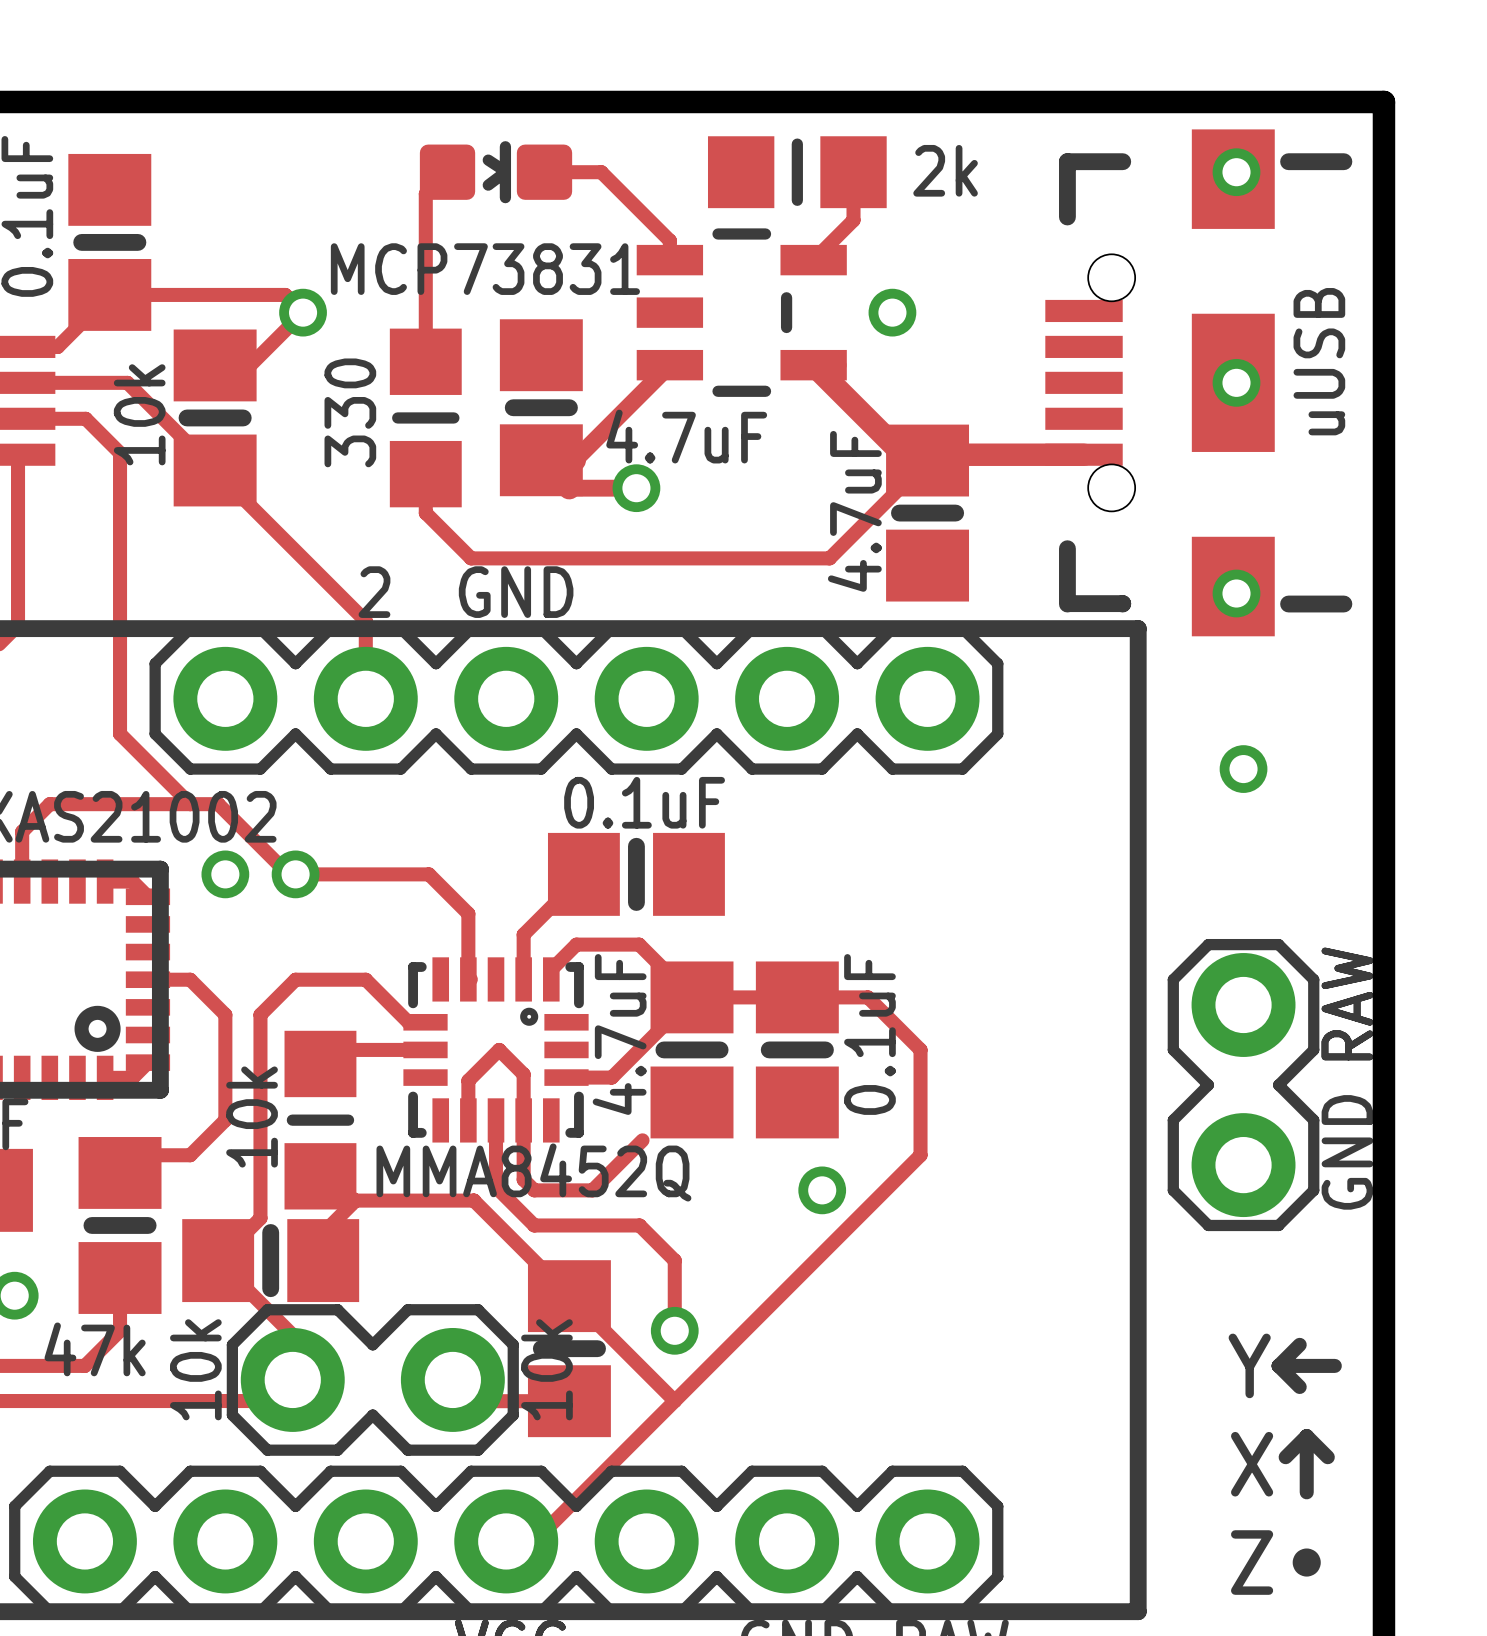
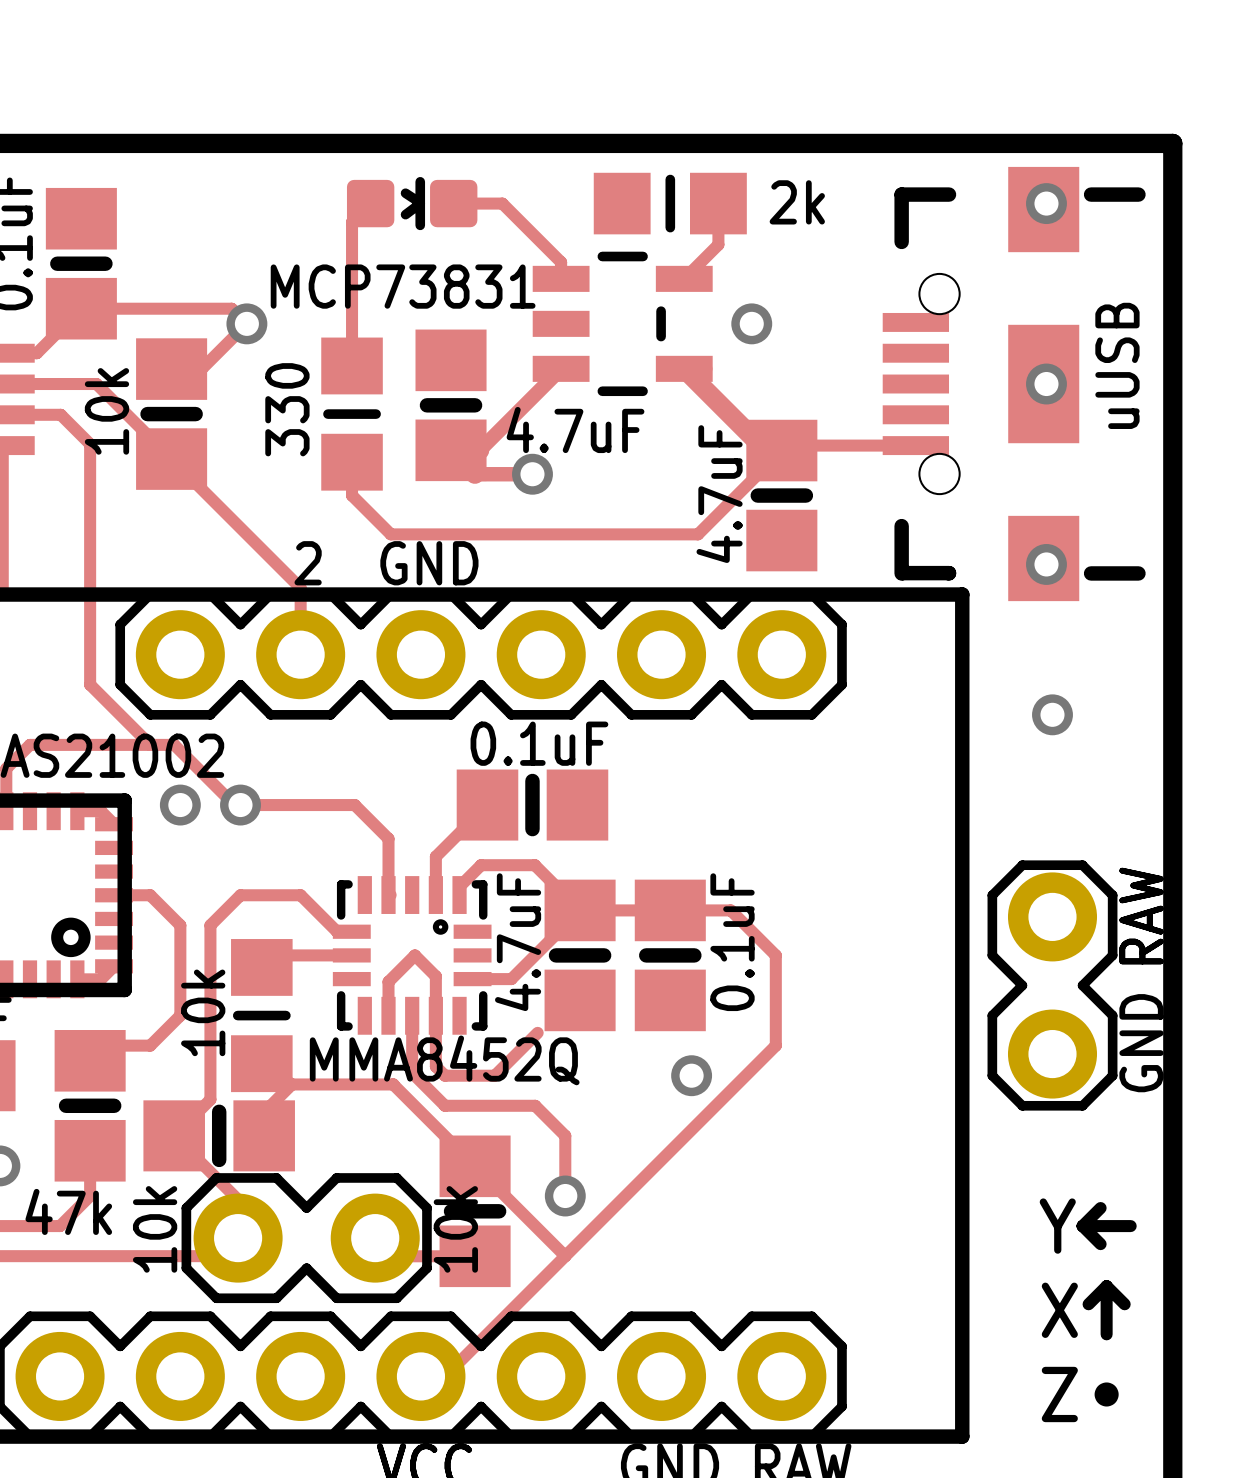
track width: thick (933, 454) (1084, 454) -> thin (786, 445) (915, 445)

